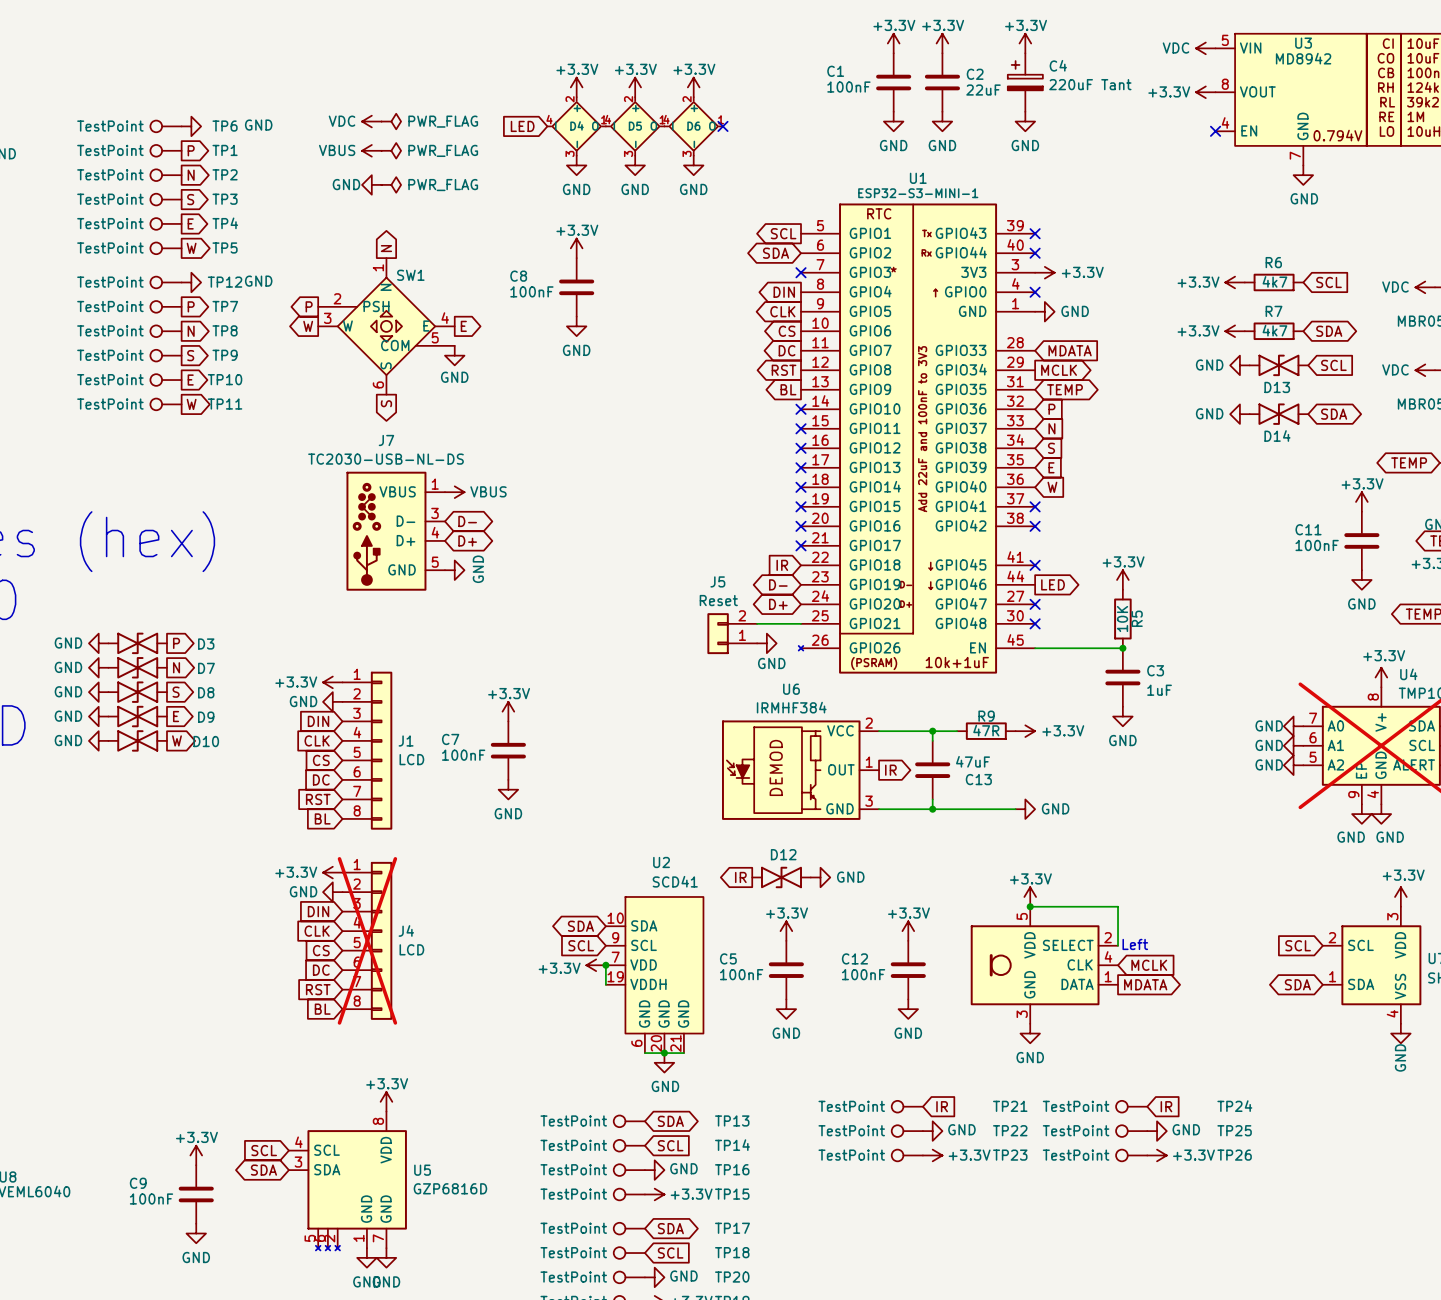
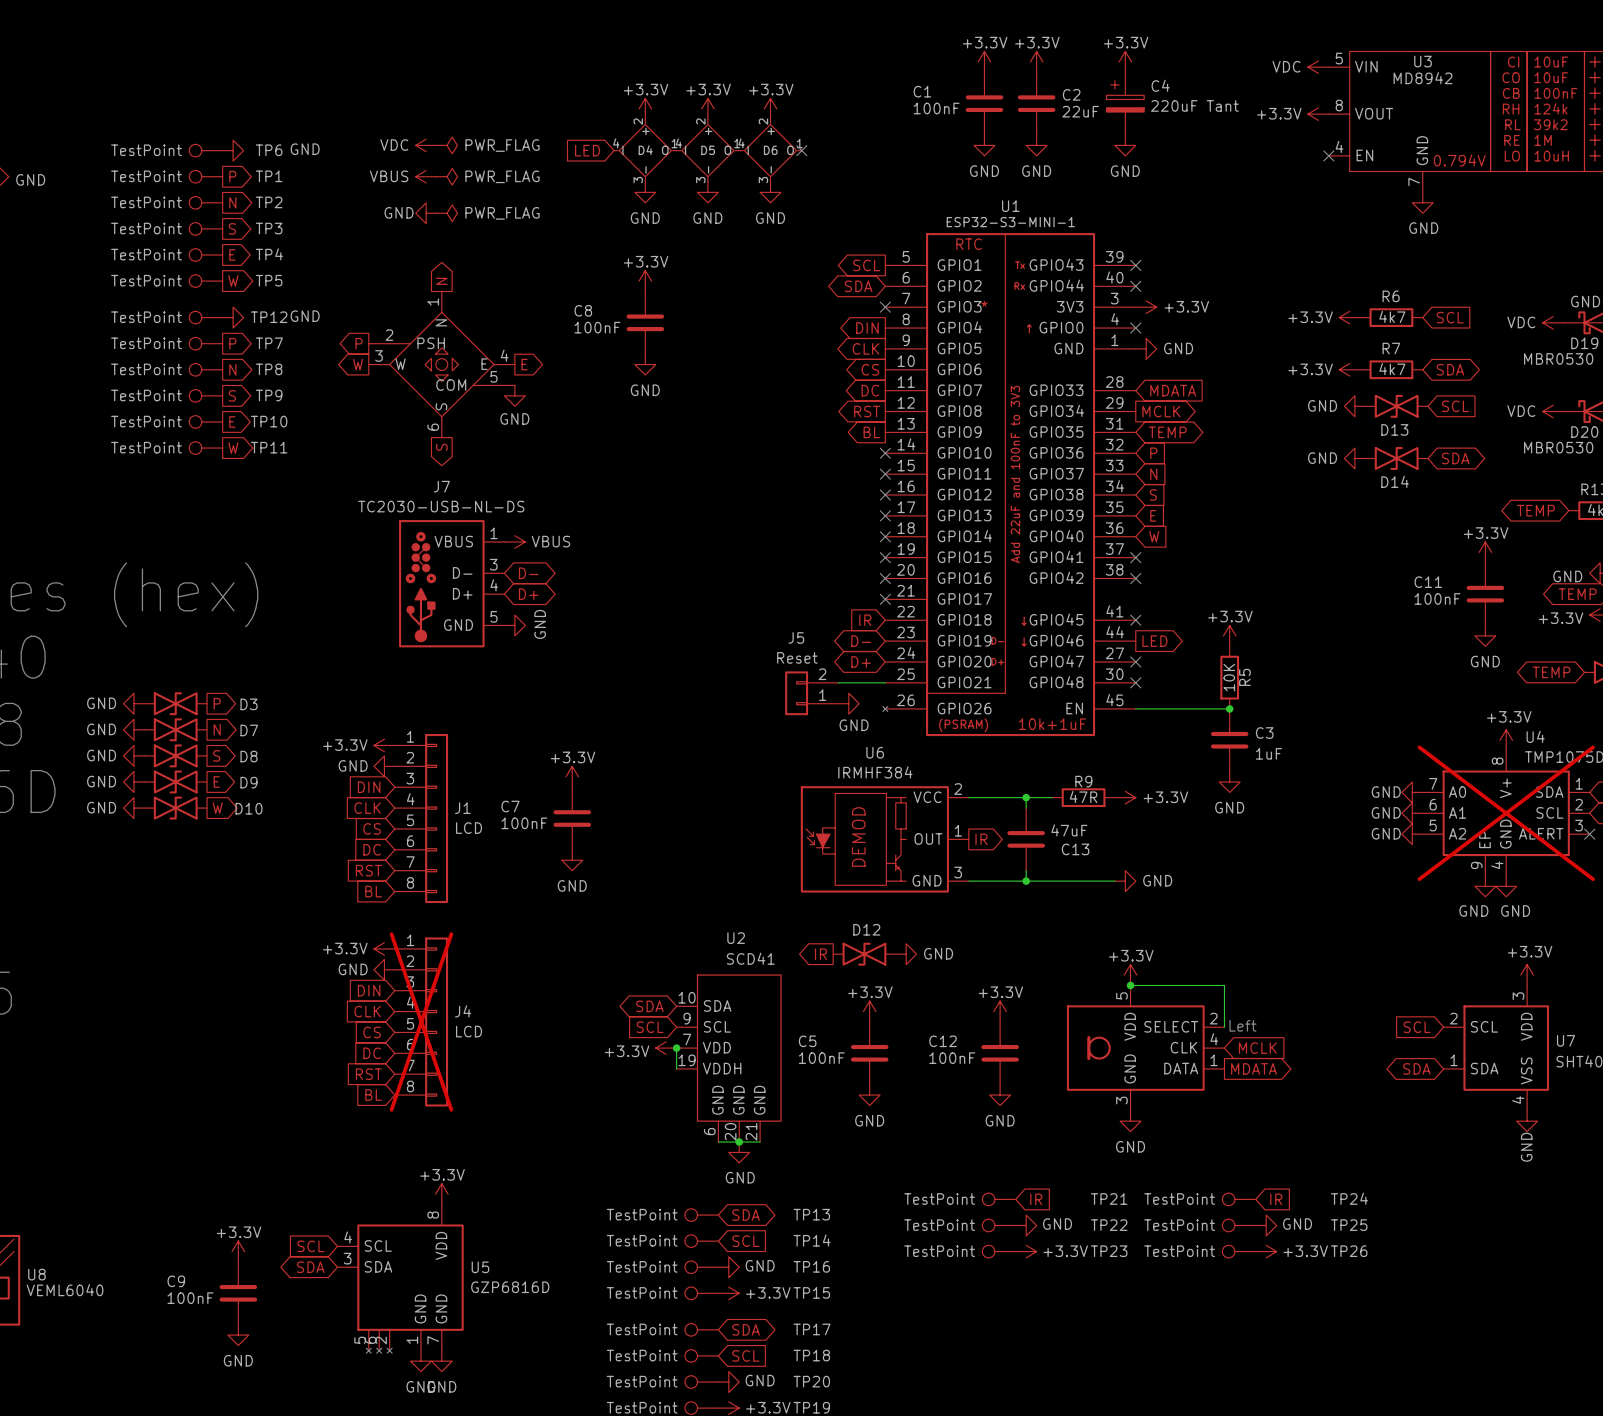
SW1 name: SW1 (410, 275) -> none

